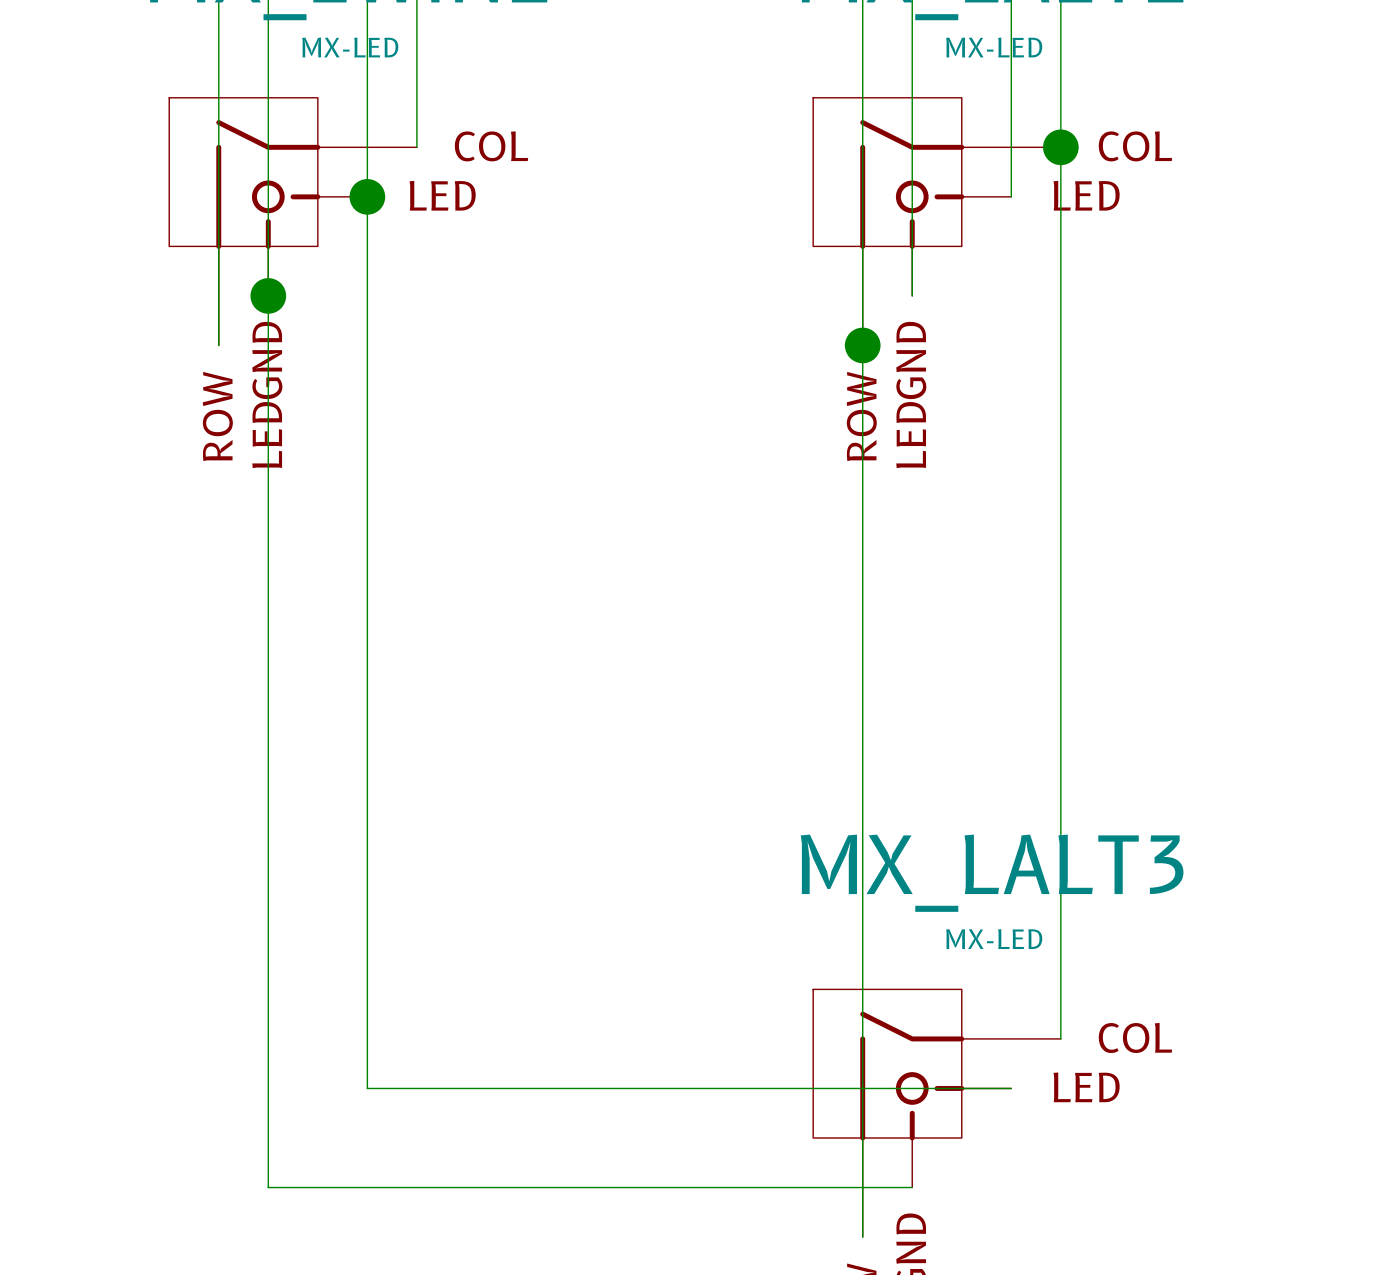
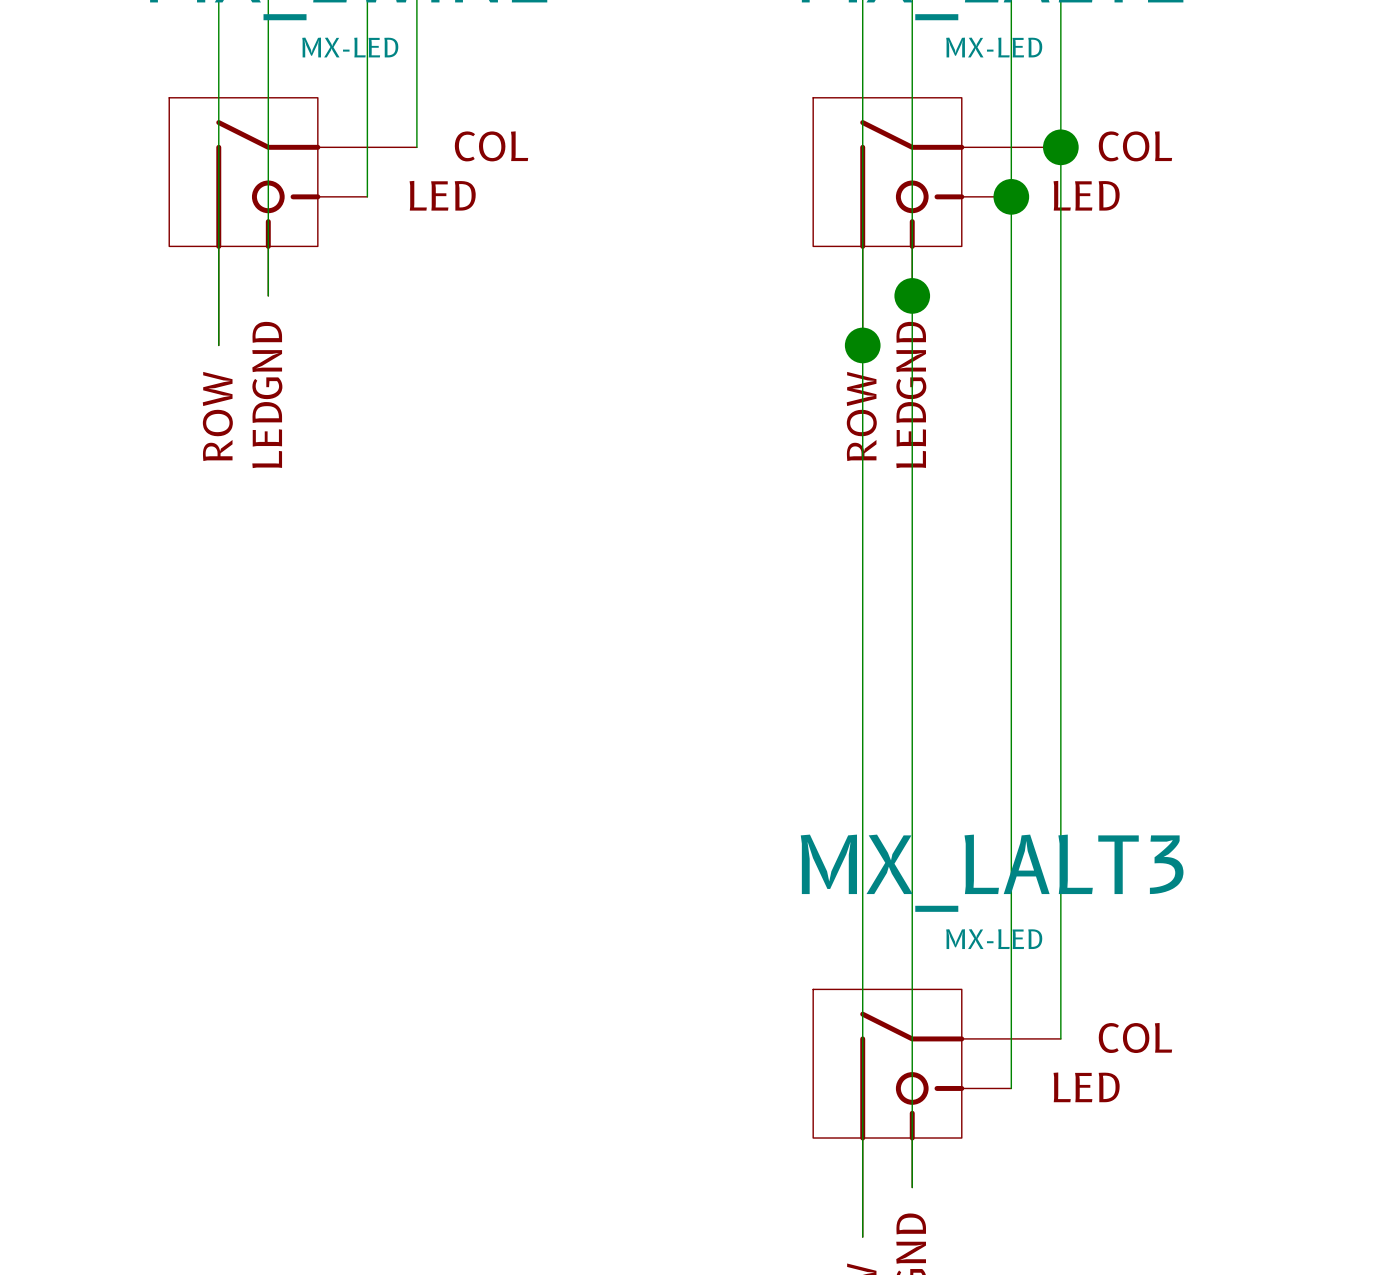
wire: (367, 196) (367, 1088) (1011, 1088) -> (1011, 196) (1011, 1088)
junction: (367, 196) -> none
junction: none -> (1011, 196)
wire: (268, 295) (268, 1187) (912, 1187) -> (912, 295) (912, 1187)
junction: (268, 295) -> none
junction: none -> (912, 295)

